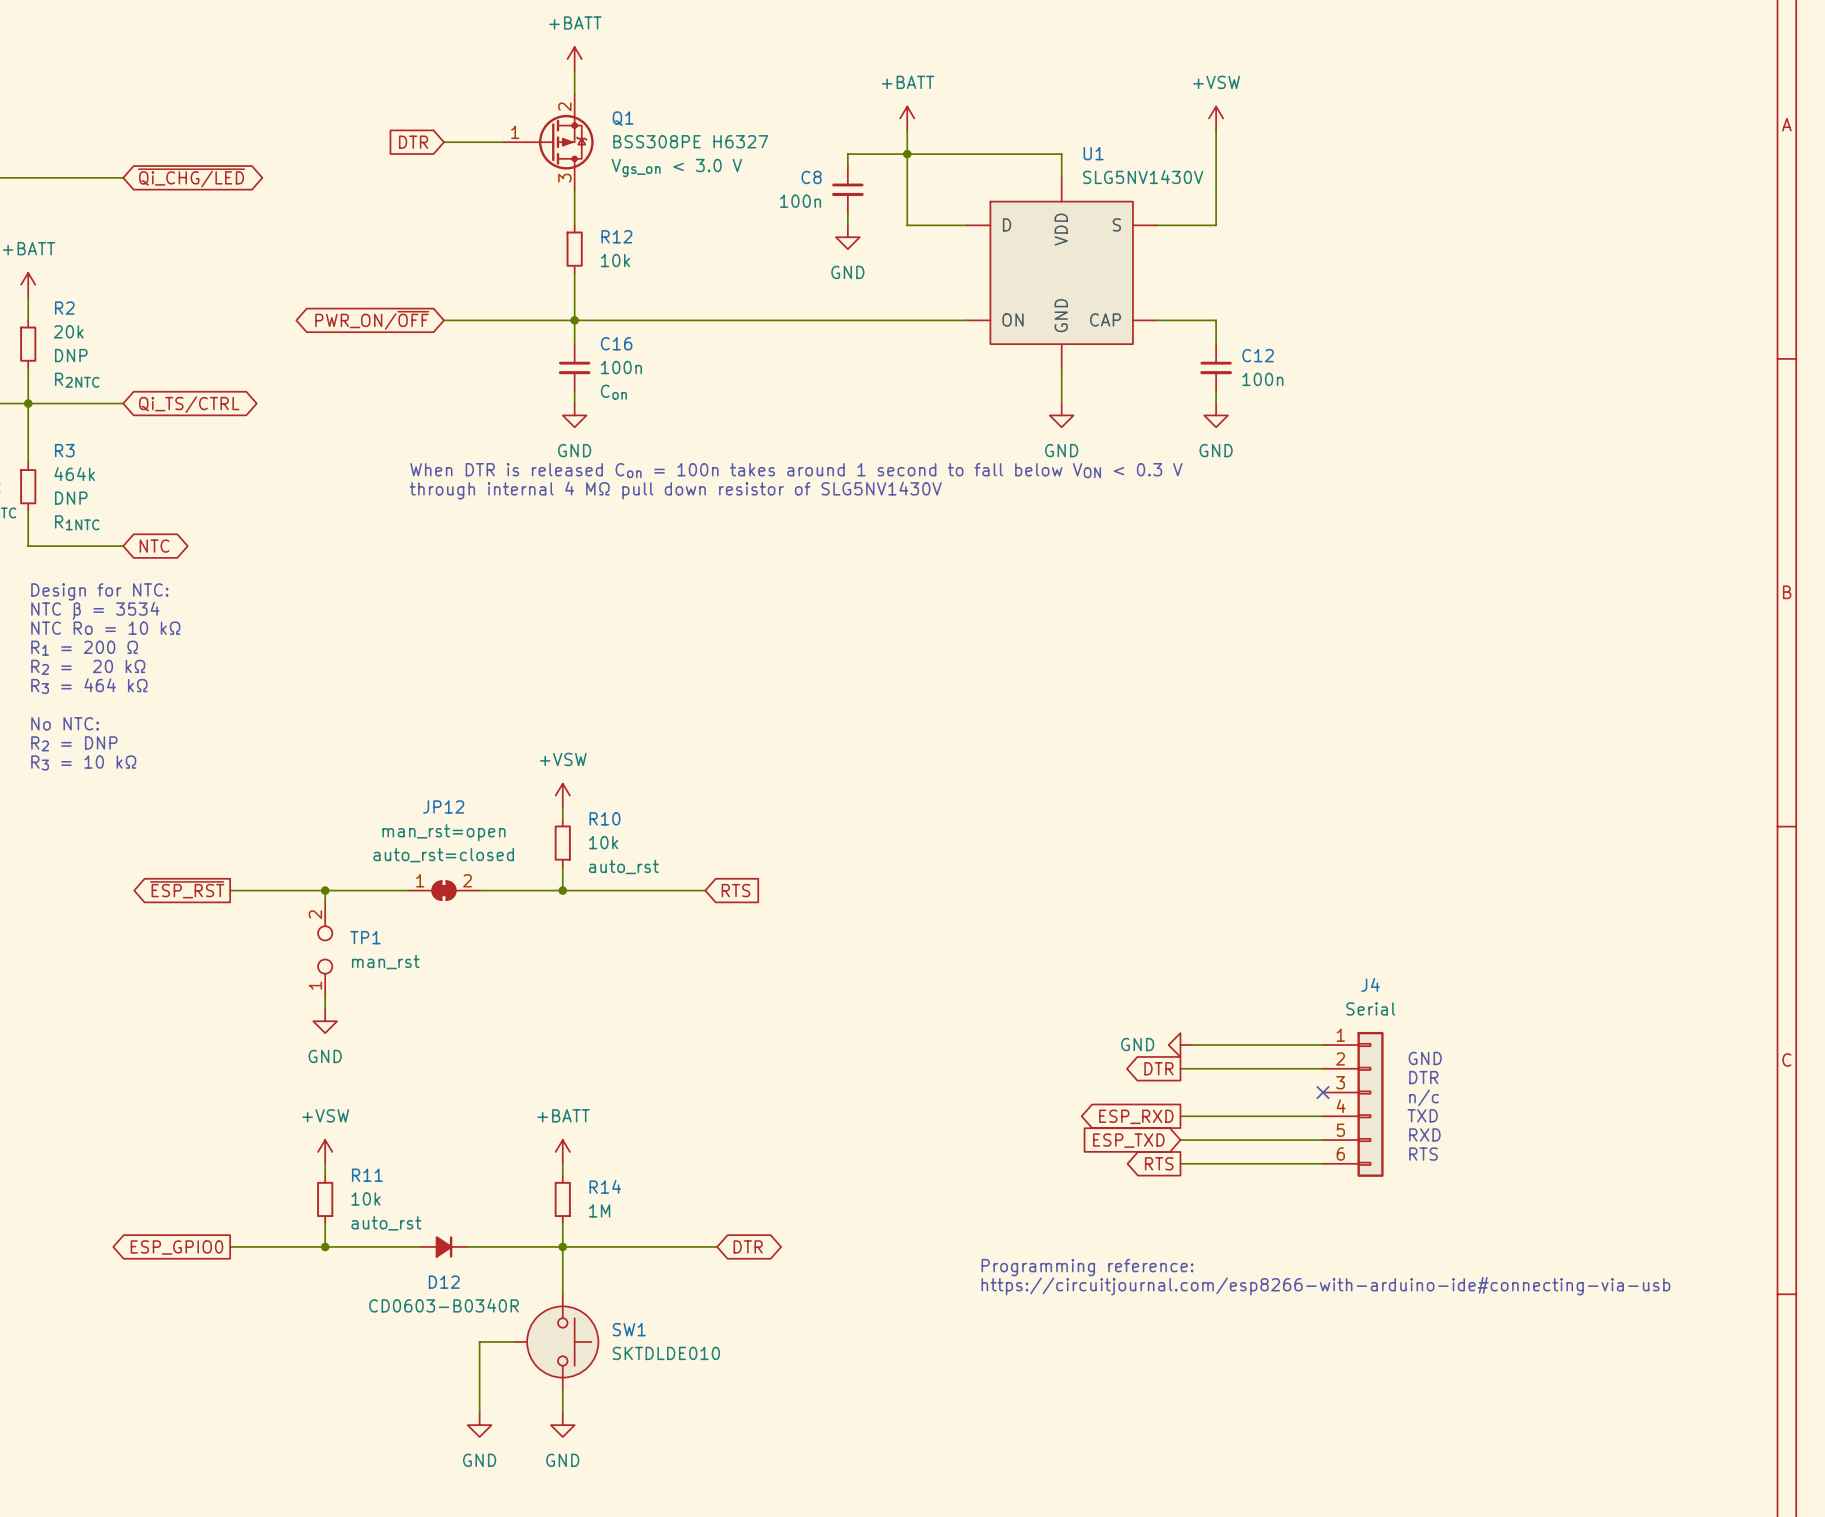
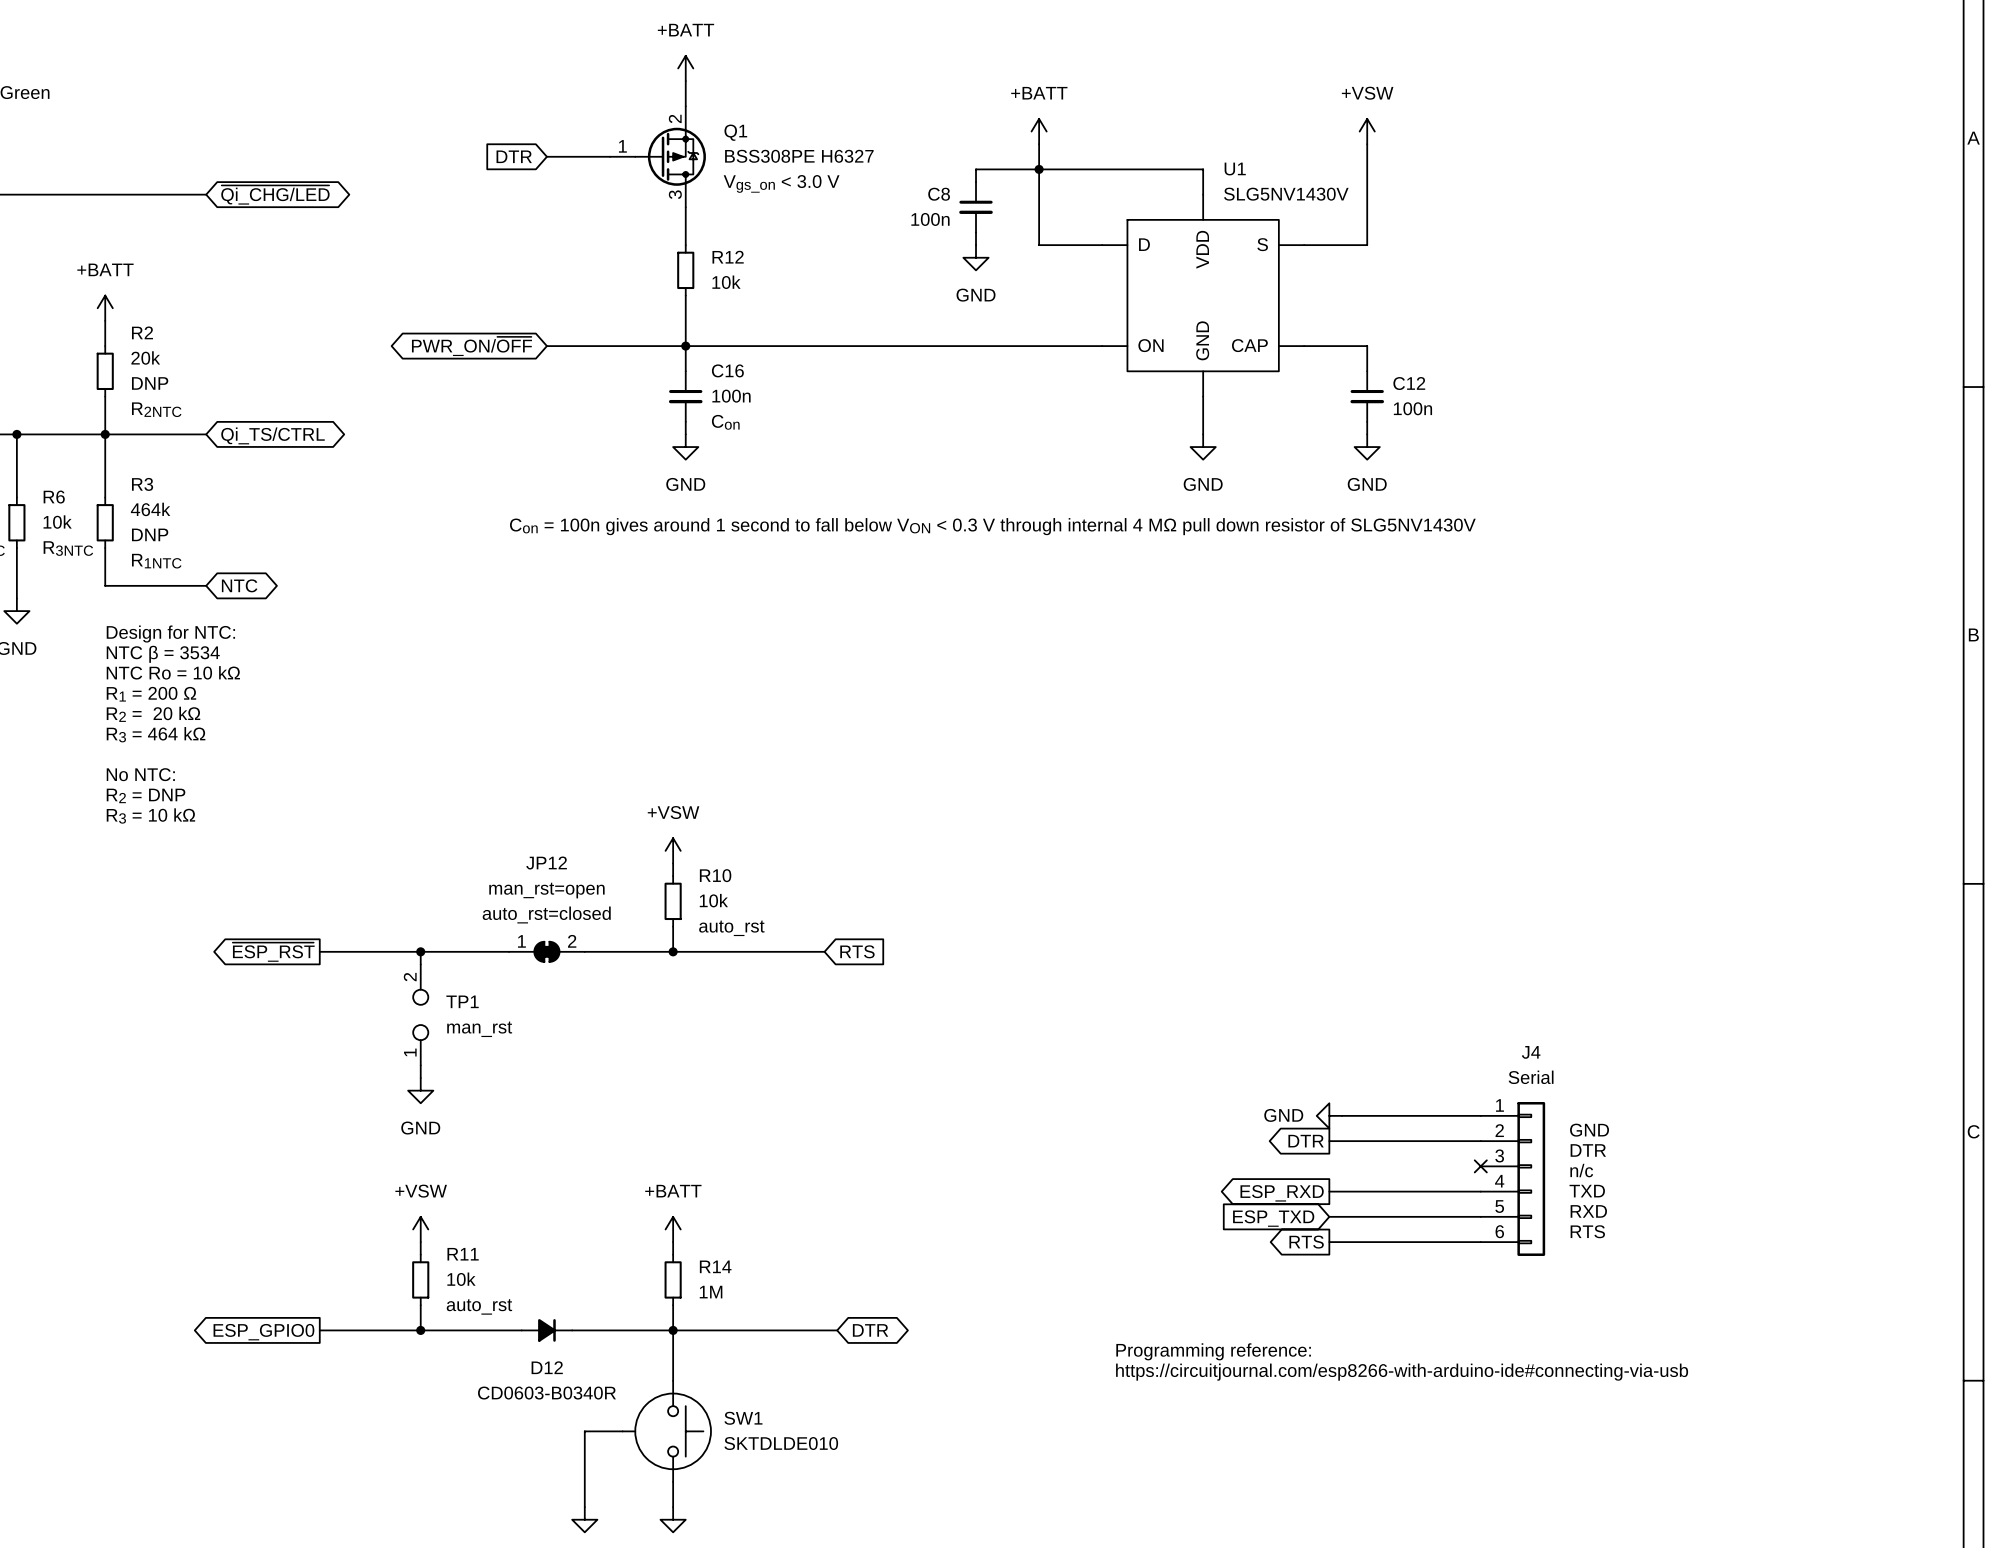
text: When DTR is released Con = 100n takes around 1 second to fall below VON < 0.3 V (796, 470) -> none
text: through internal 4 MΩ pull down resistor of SLG5NV1430V (675, 490) -> Con = 100n gives around 1 second to fall below VON < 0.3 V through internal 4 MΩ pull down resistor of SLG5NV1430V (992, 526)

